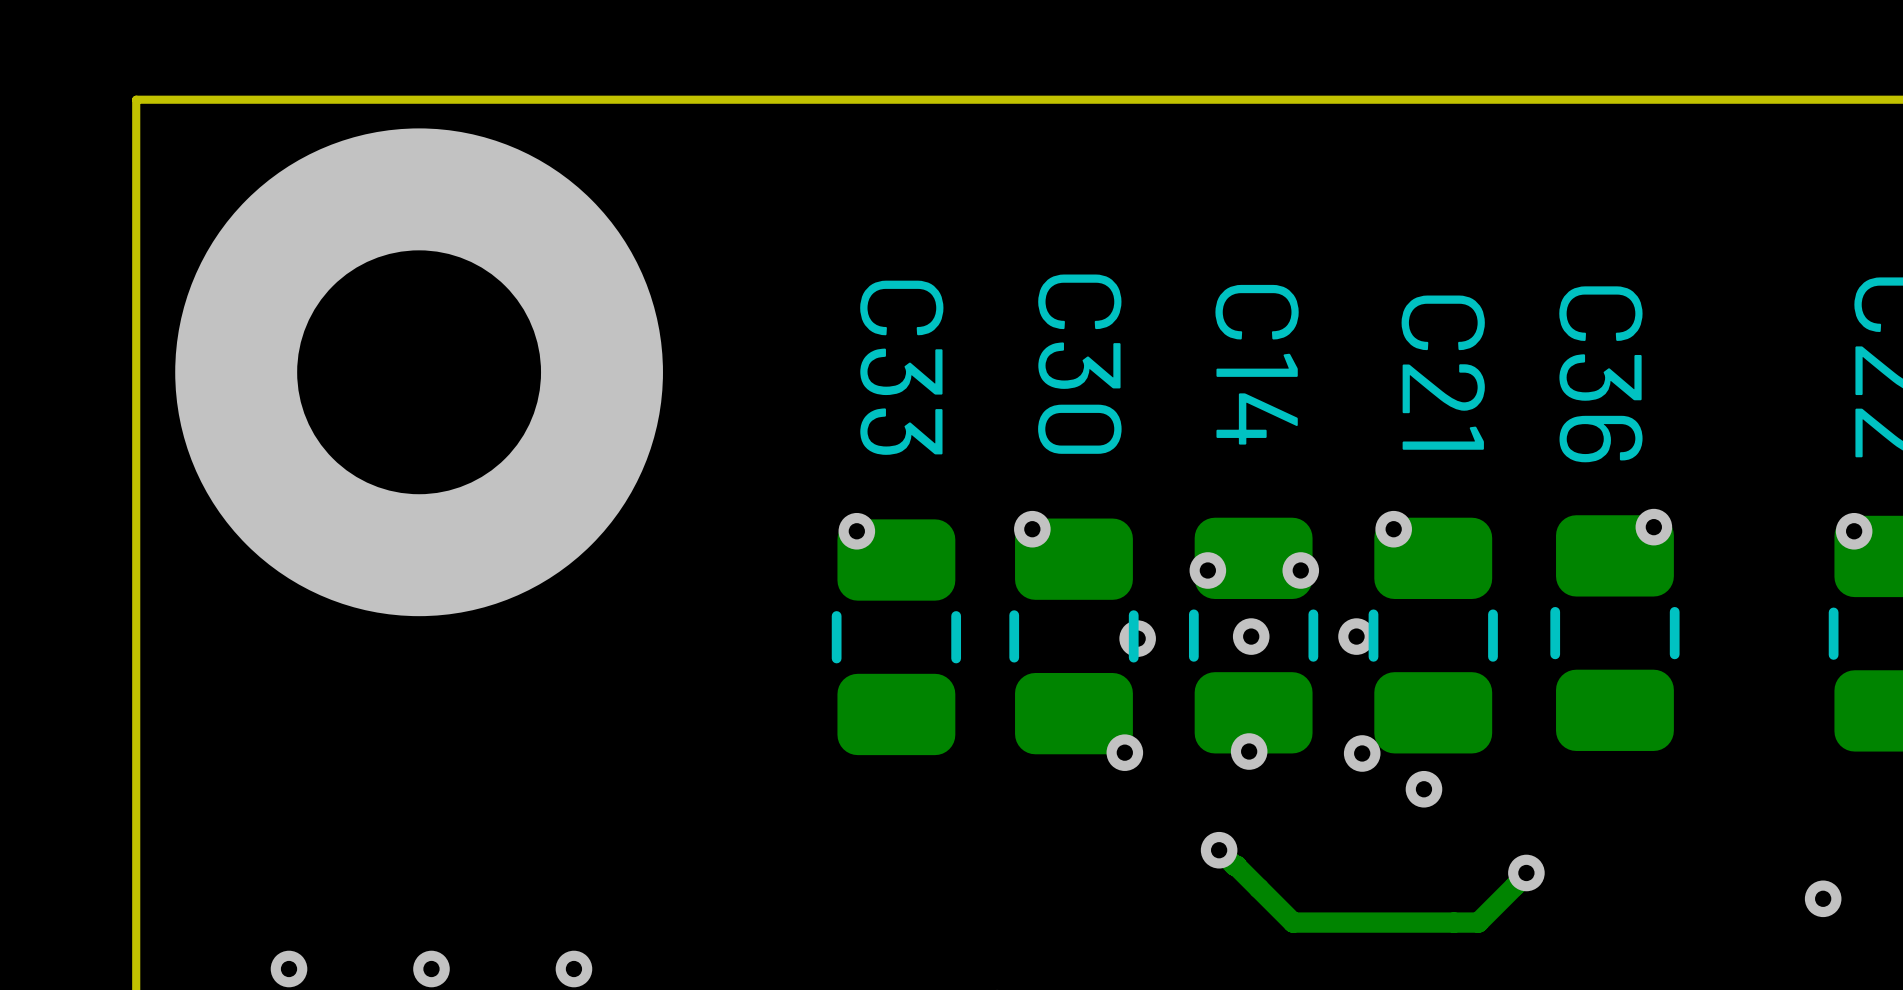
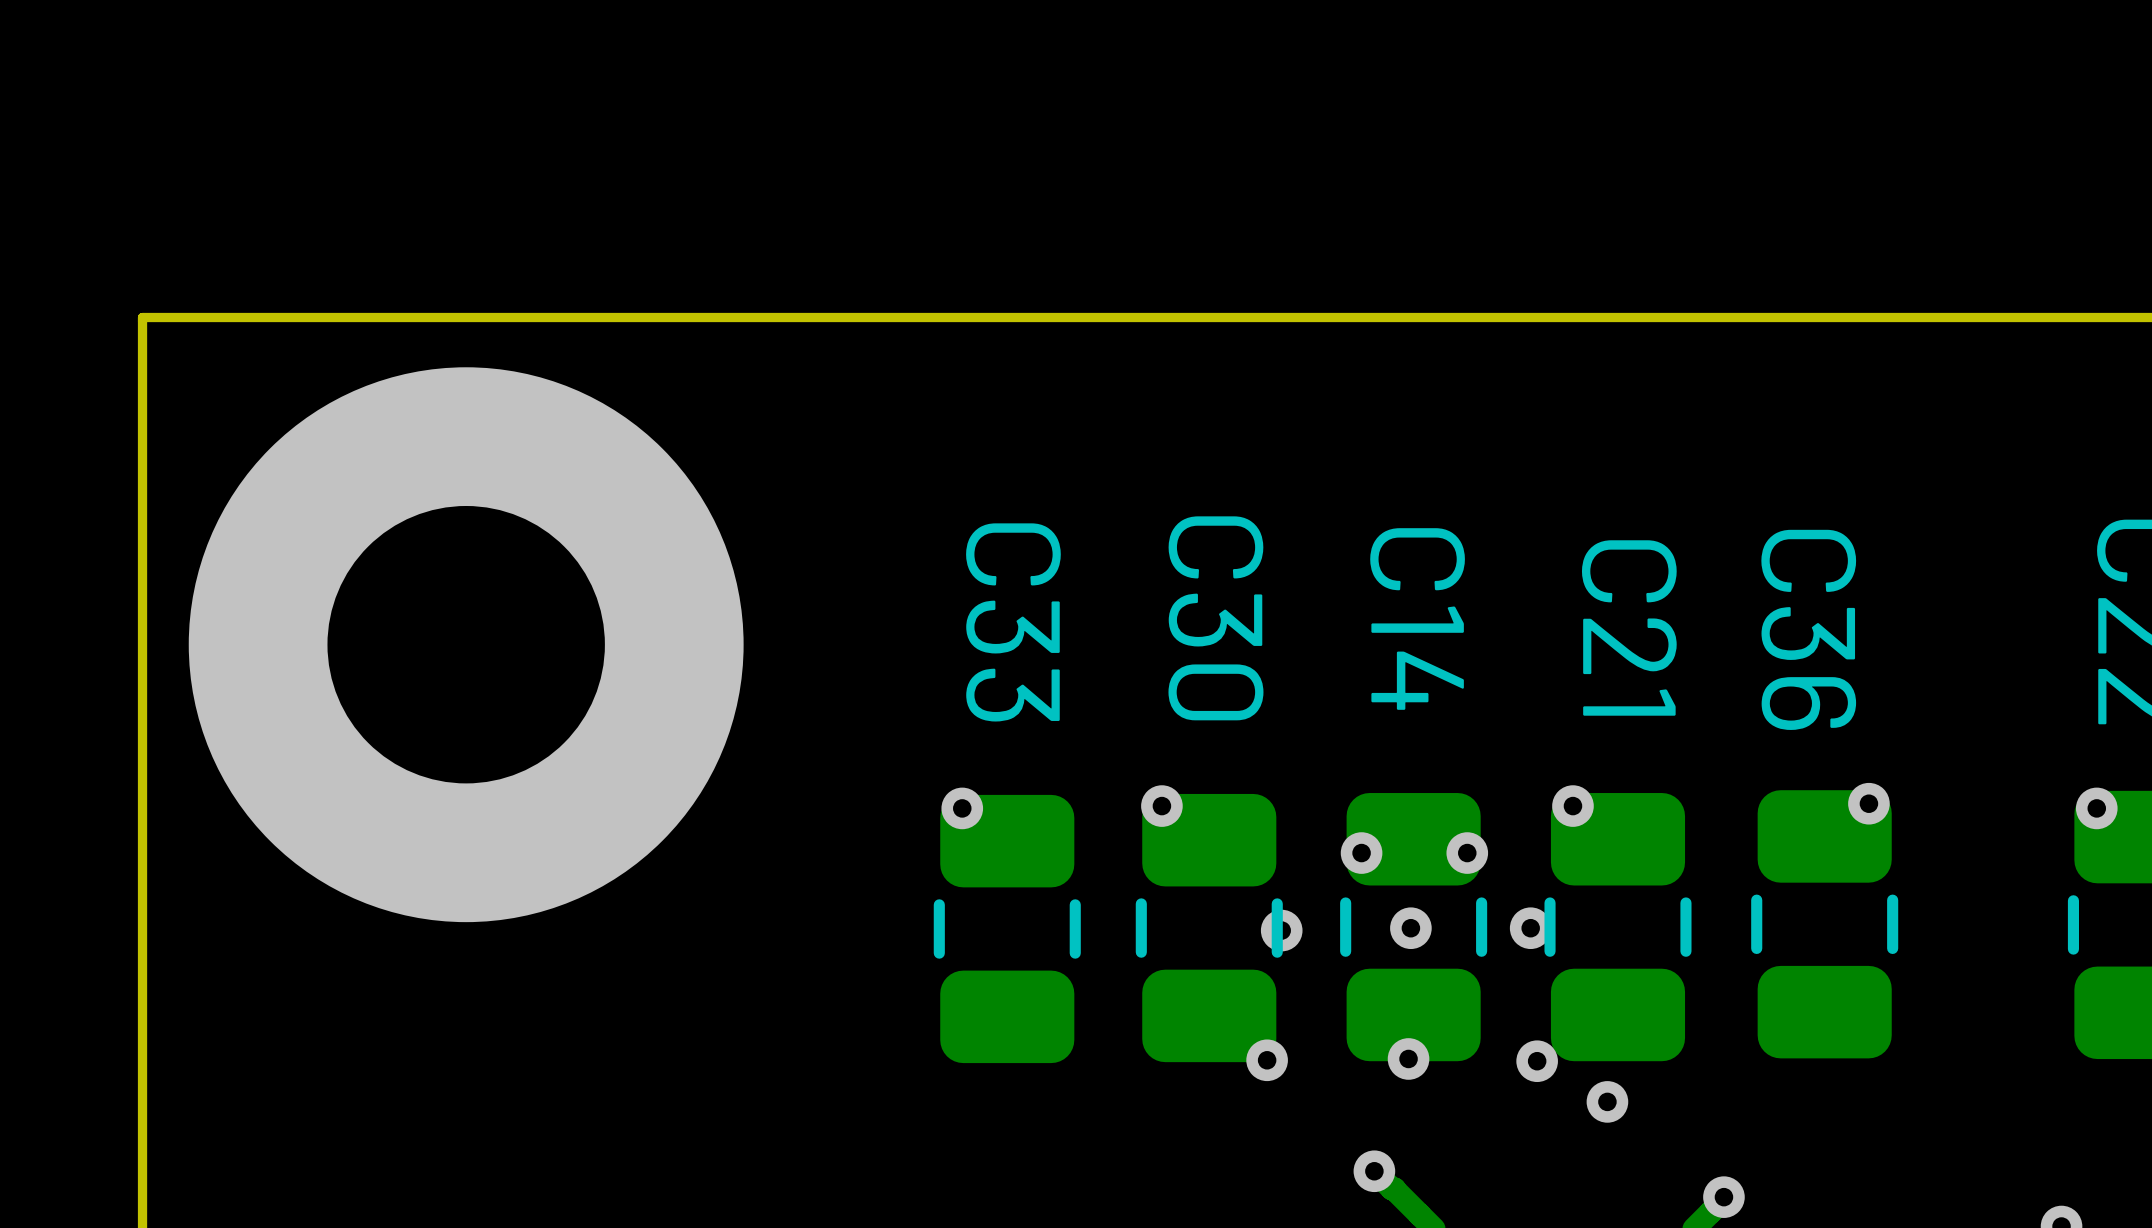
via position: (419, 372) -> (466, 644)

